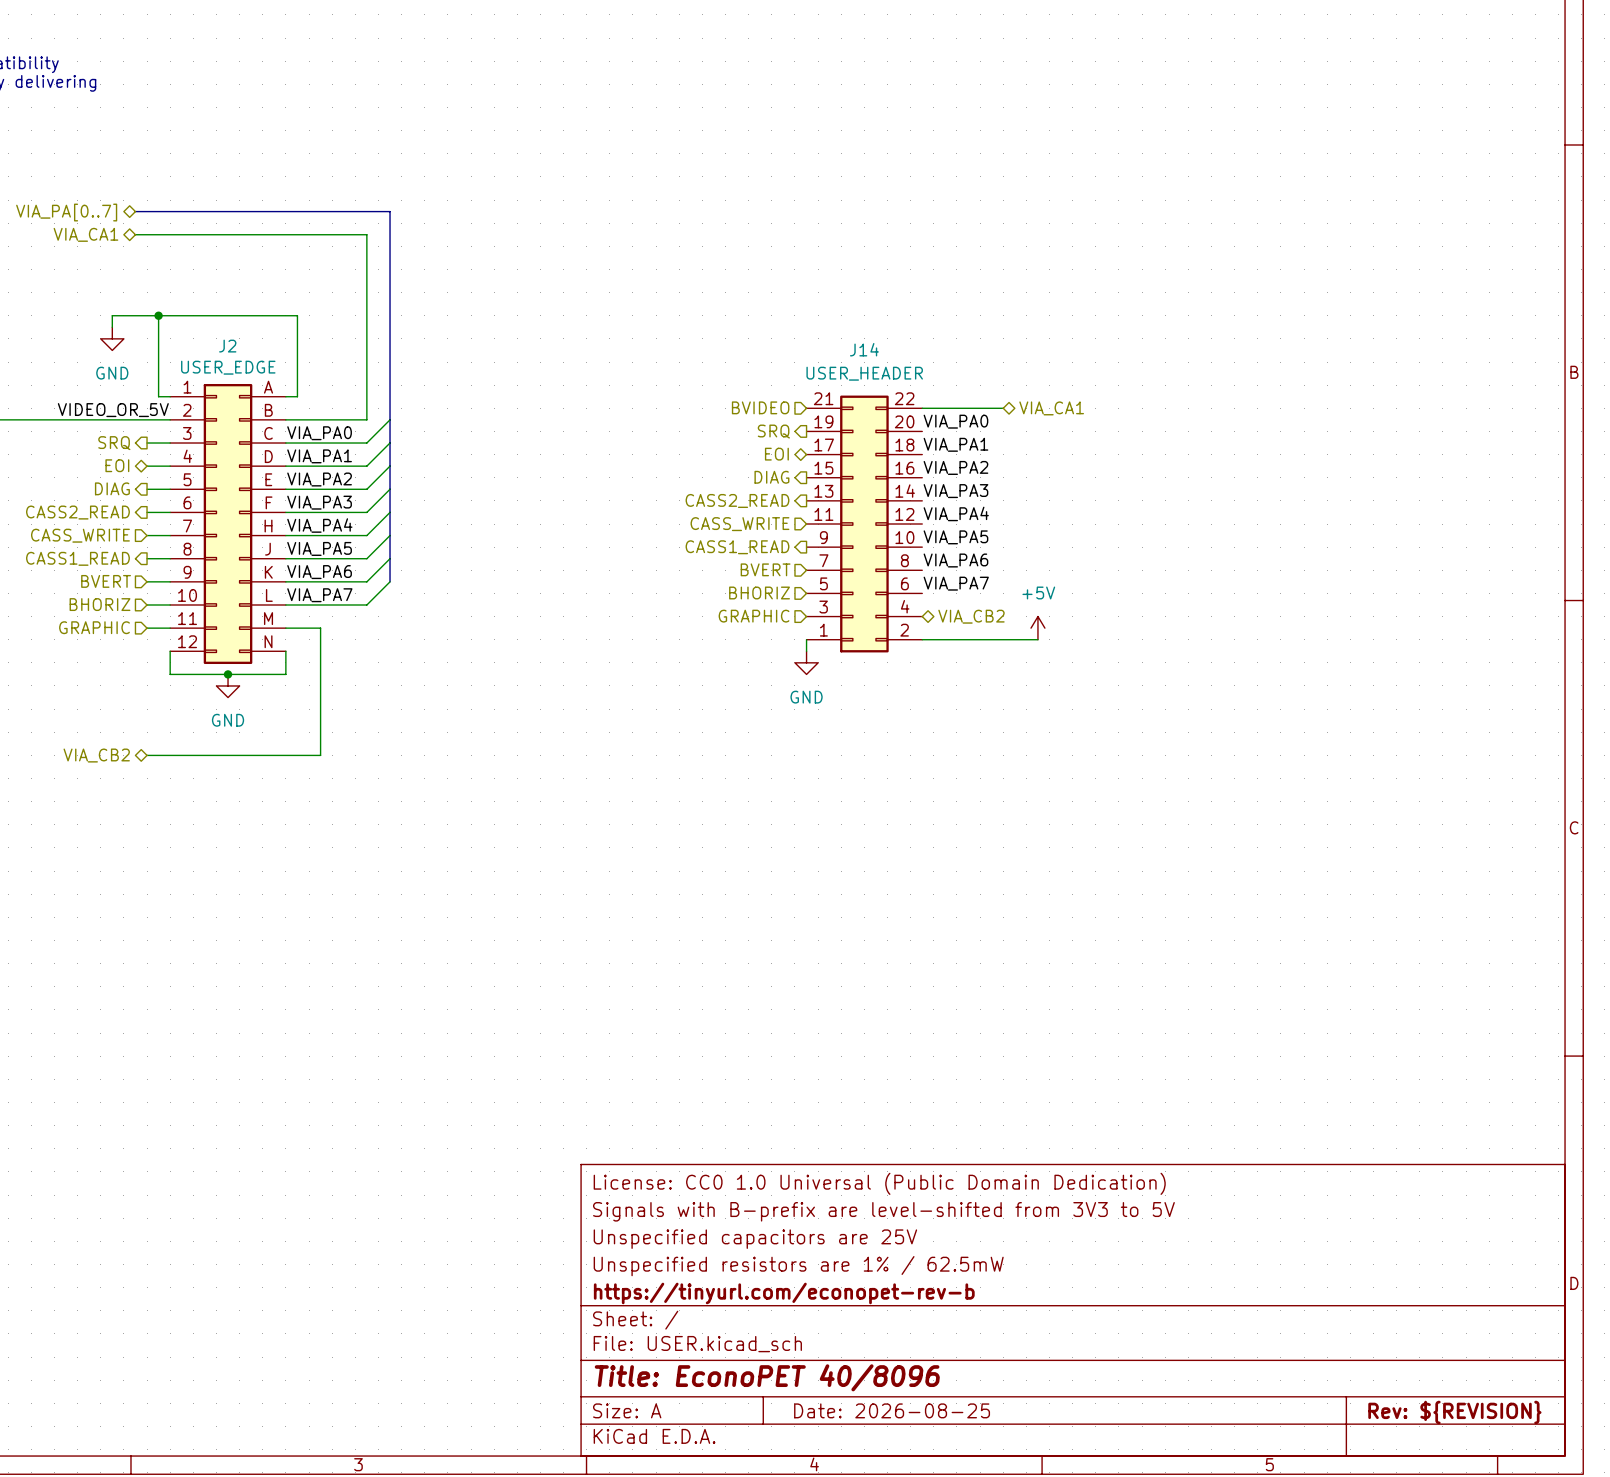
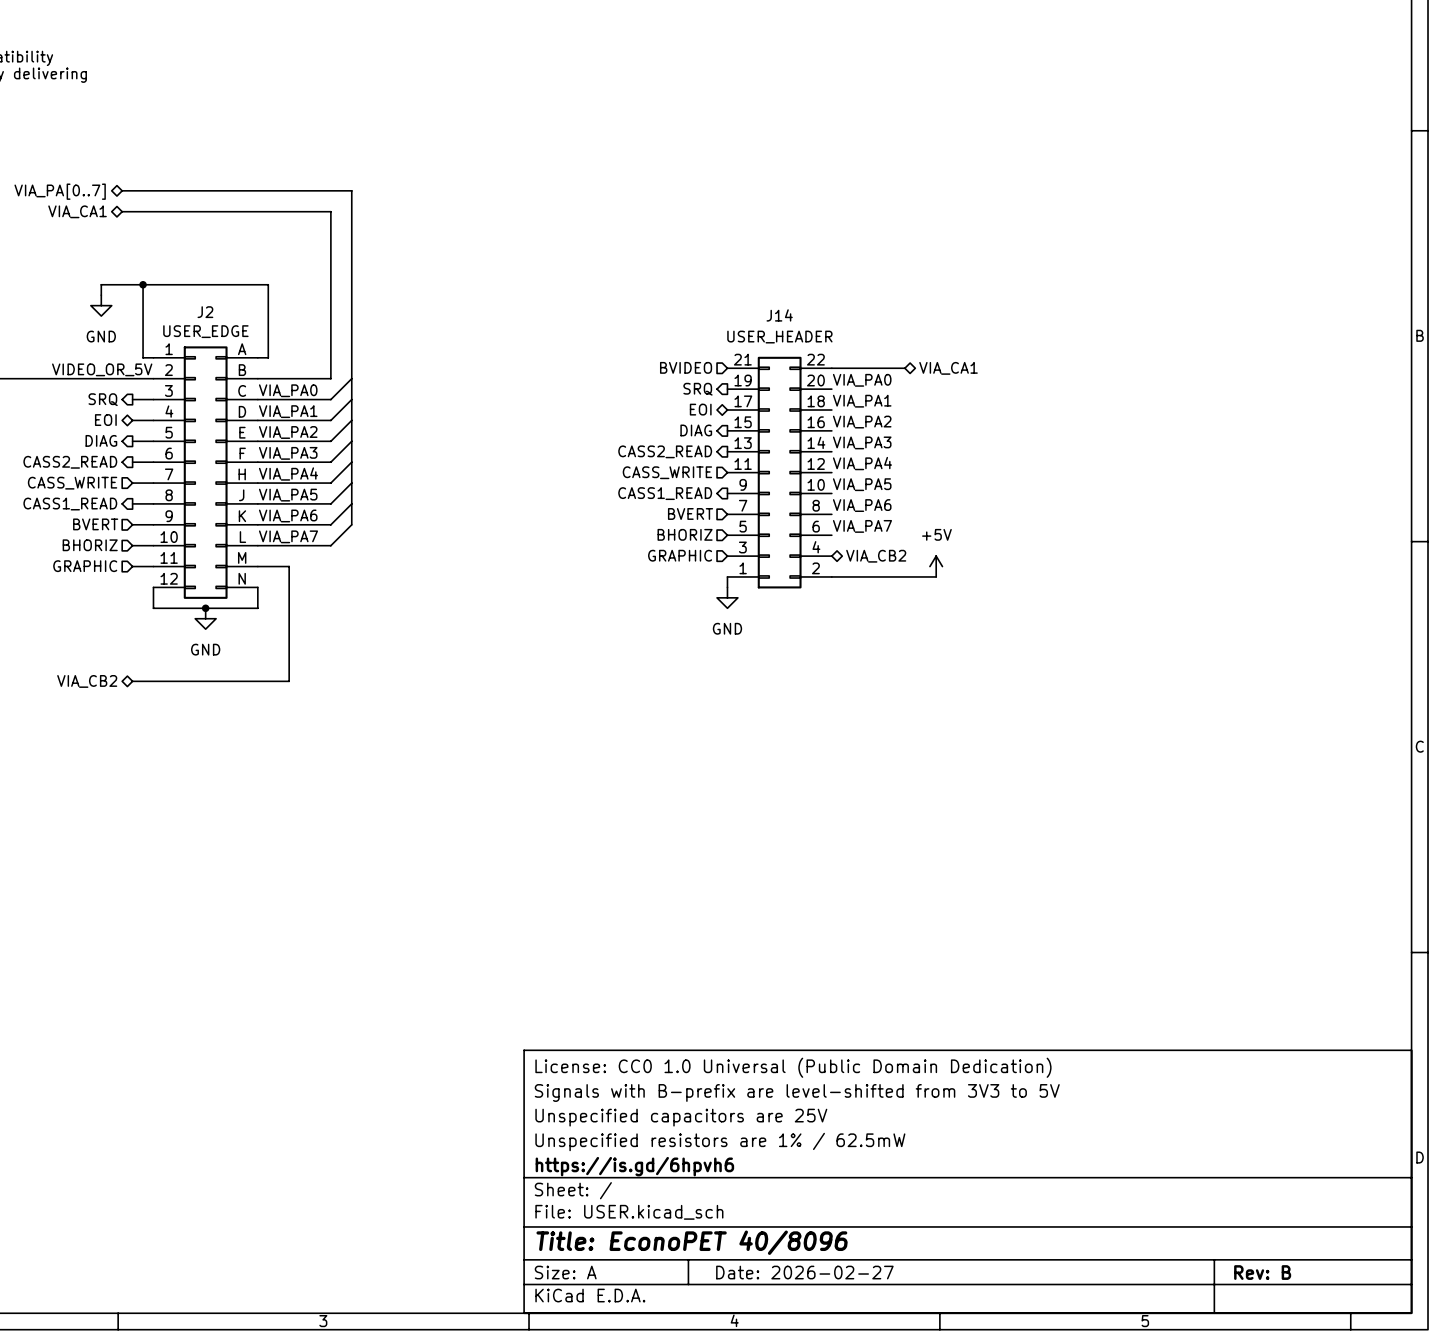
title block: https://tinyurl.com/econopet-rev-b (784, 1293) -> https://is.gd/6hpvh6 (634, 1166)
title block: Date: 2026-08-25 (892, 1410) -> Date: 2026-02-27 (804, 1272)
title block: Rev: ${REVISION} (1454, 1412) -> Rev: B (1262, 1272)

